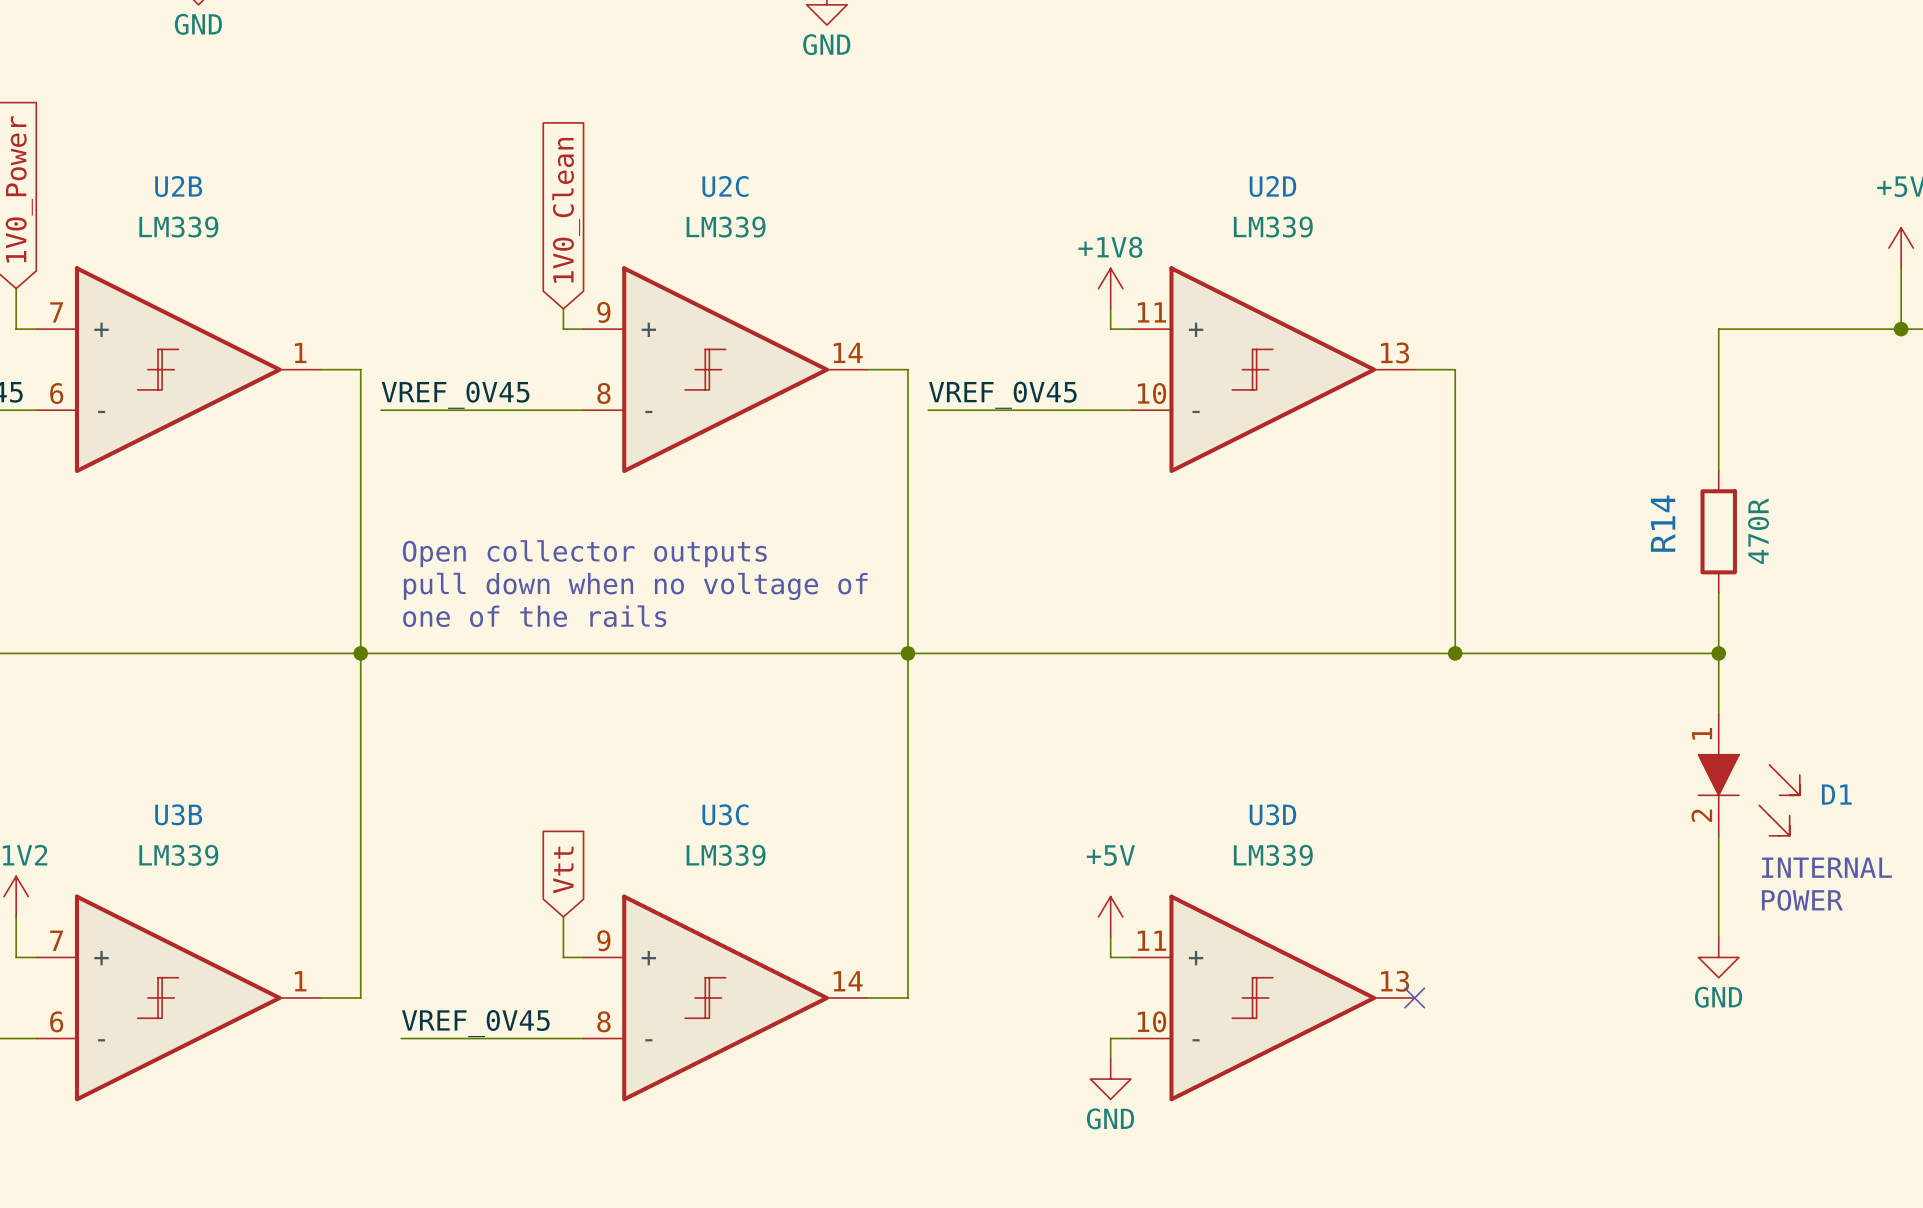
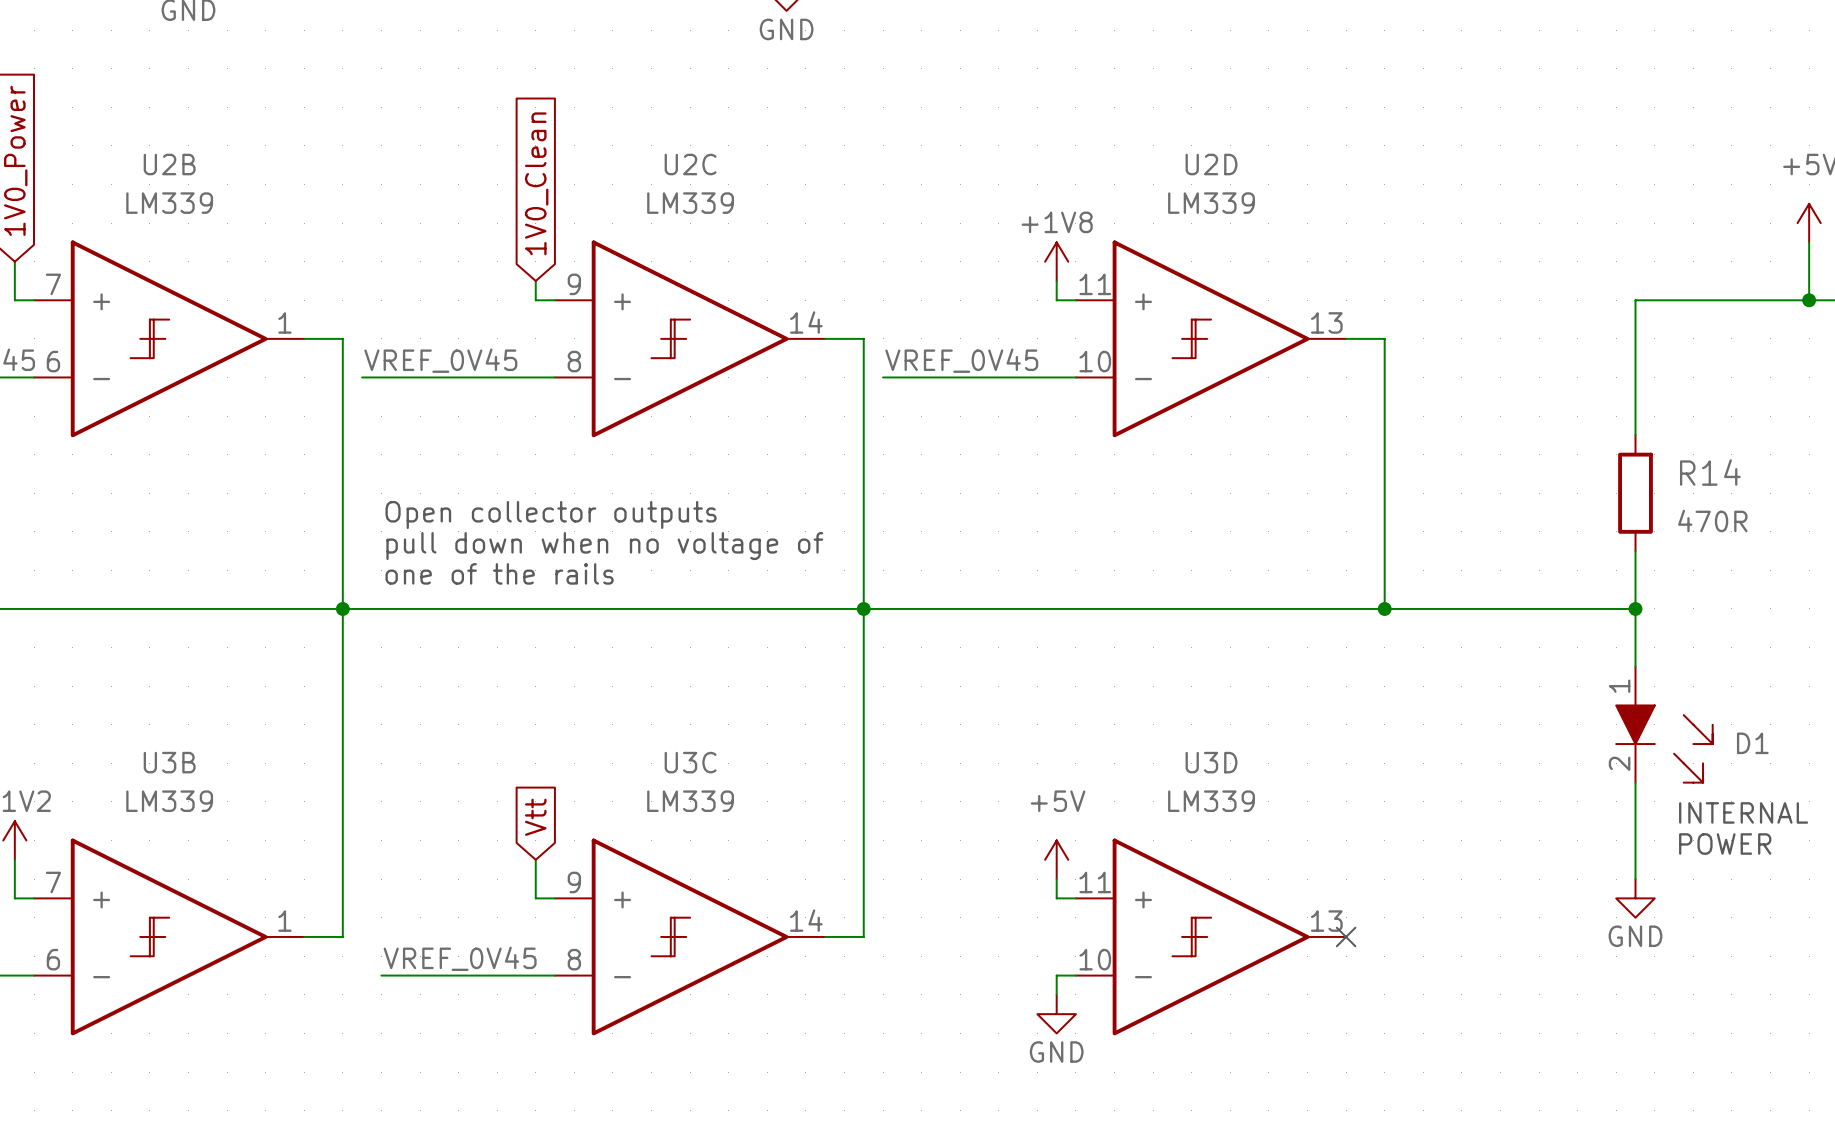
R14 name rotation: 0° (1663, 523) -> 90° clockwise (1710, 472)
R14 name position: R14 (1663, 523) -> R14 (1710, 472)
R14 text rotation: 0° (1758, 531) -> 90° clockwise (1712, 520)

